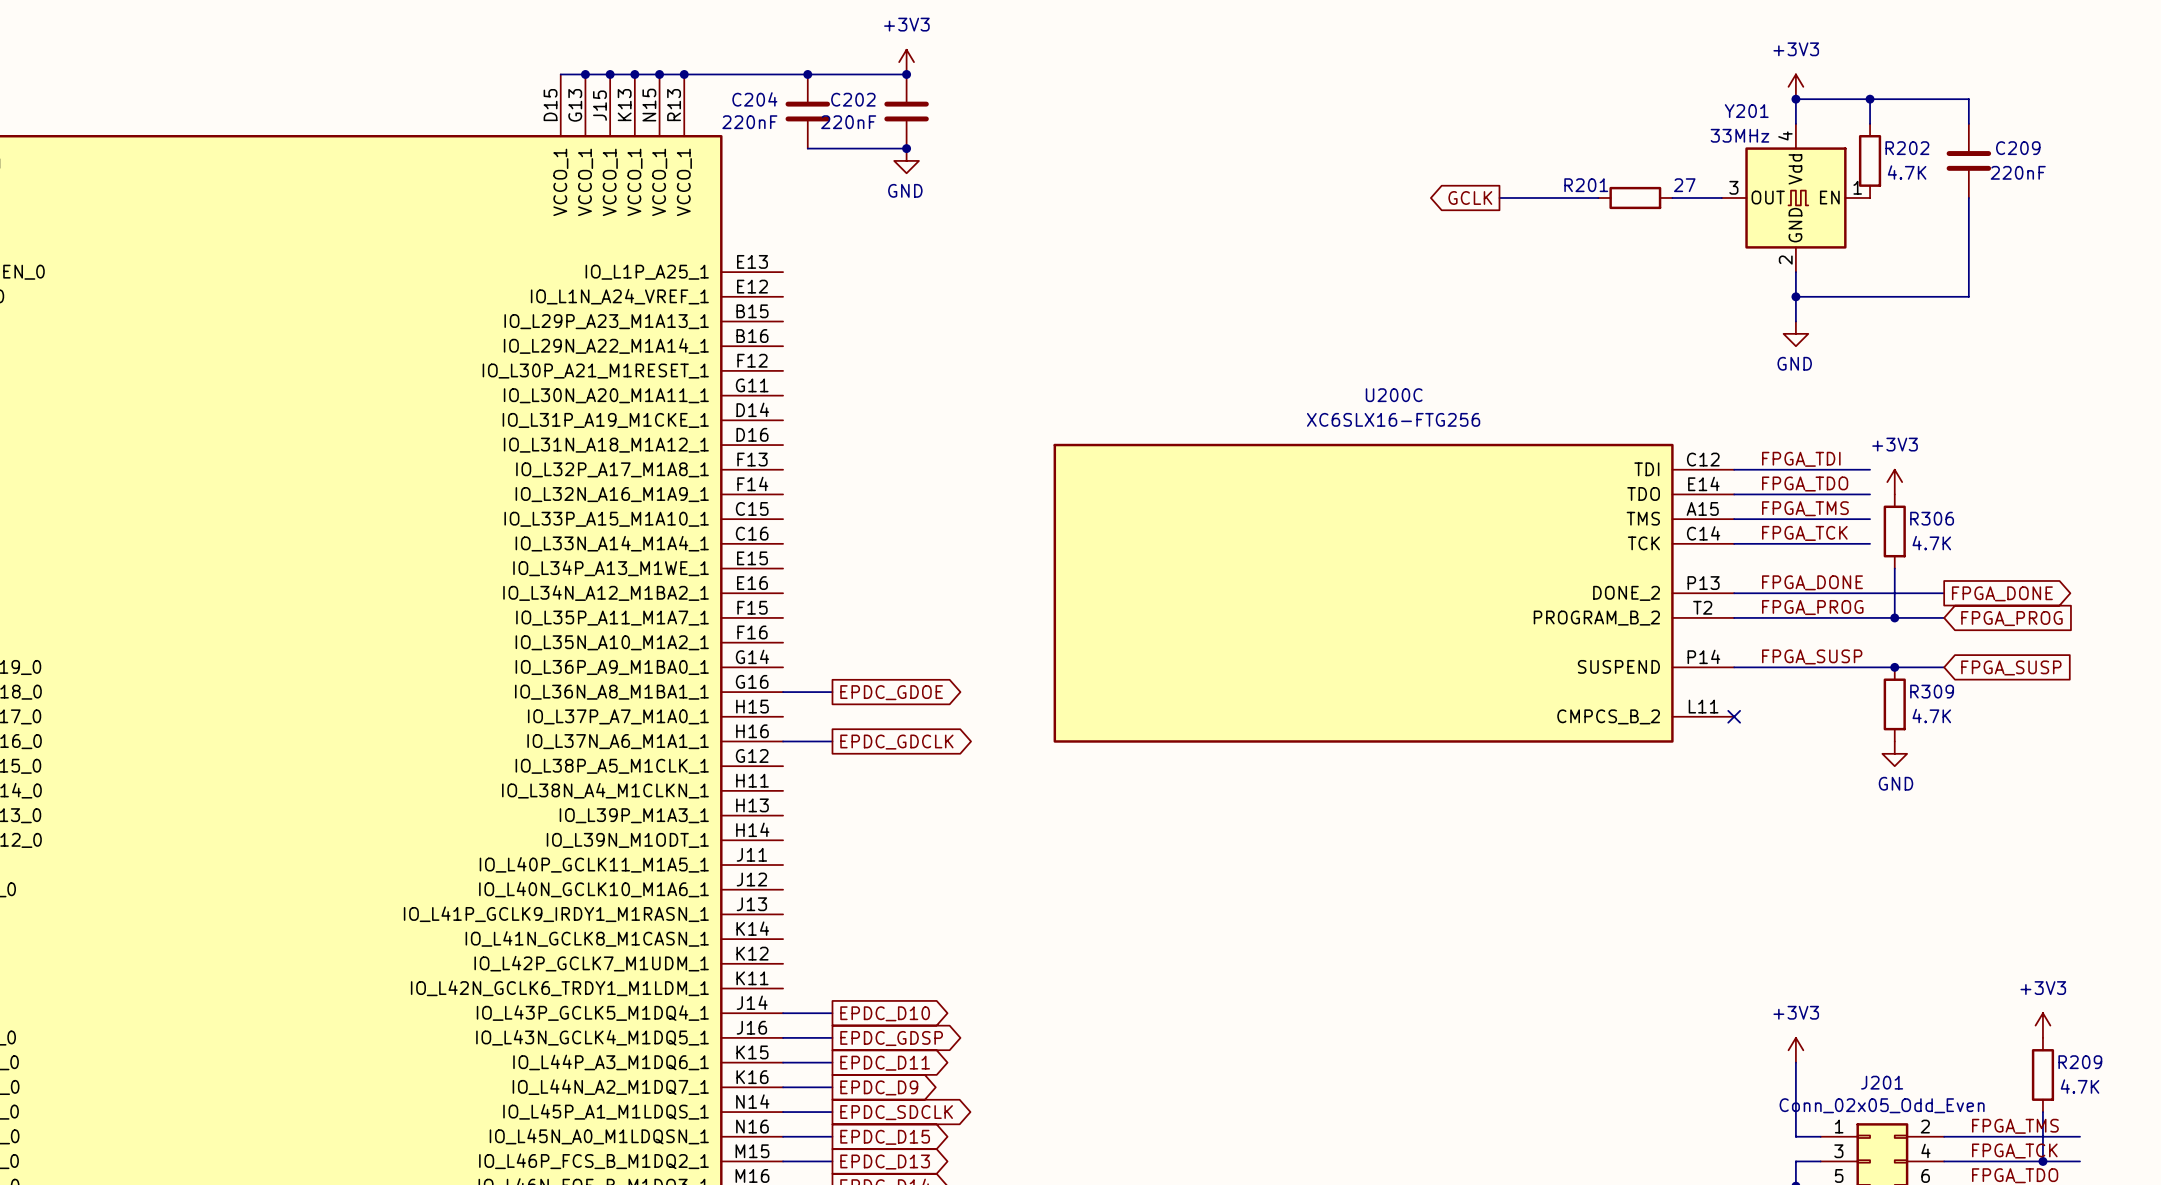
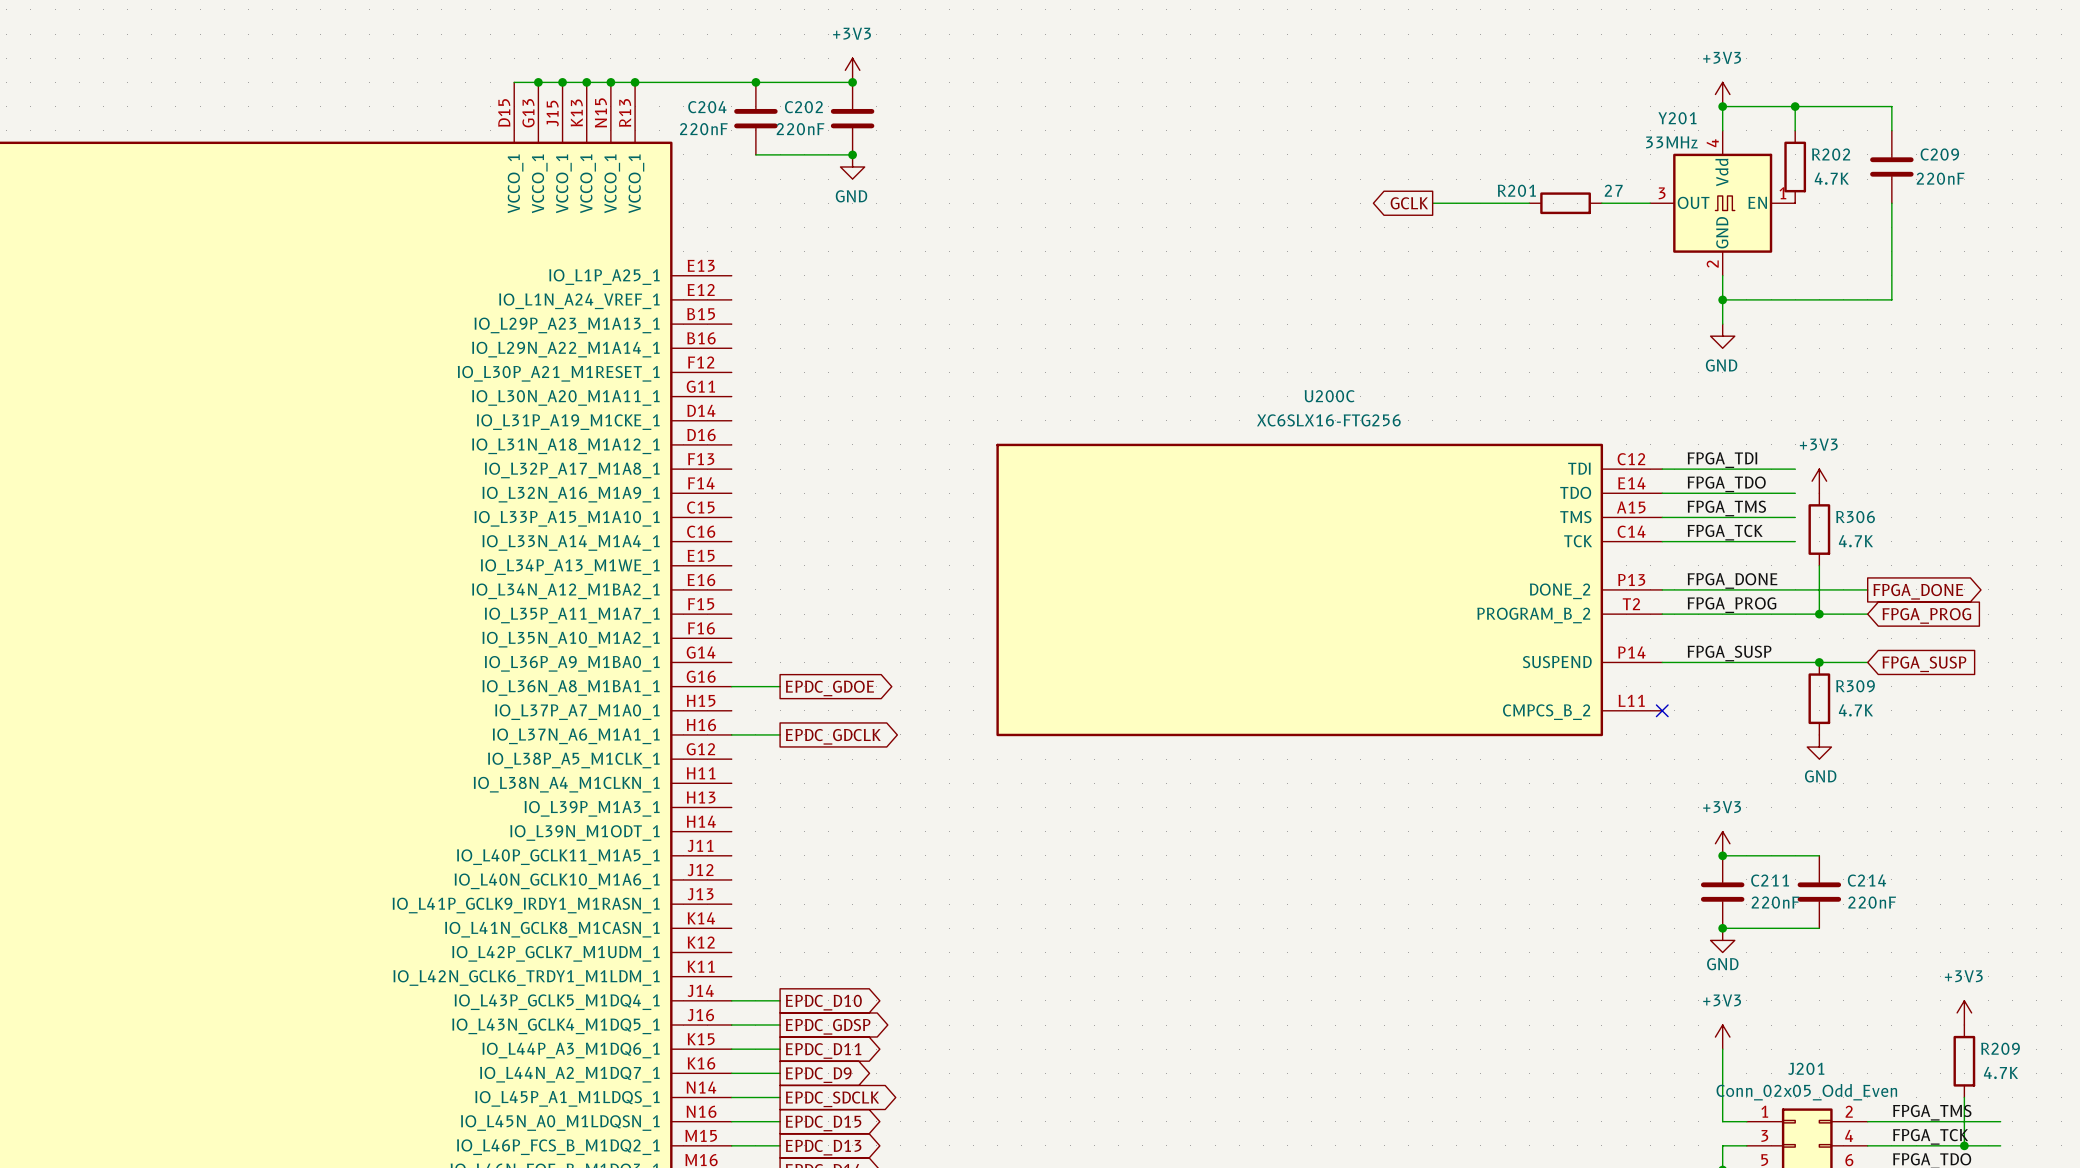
power symbol: none -> +3V3 (1722, 843)
wire: none -> (1722, 855) (1819, 855)
junction: none -> (1722, 855)
C211: none -> 220nF (1722, 892)
C214: none -> 220nF (1819, 892)
wire: none -> (1722, 928) (1819, 928)
junction: none -> (1722, 928)
power symbol: none -> GND (1722, 940)

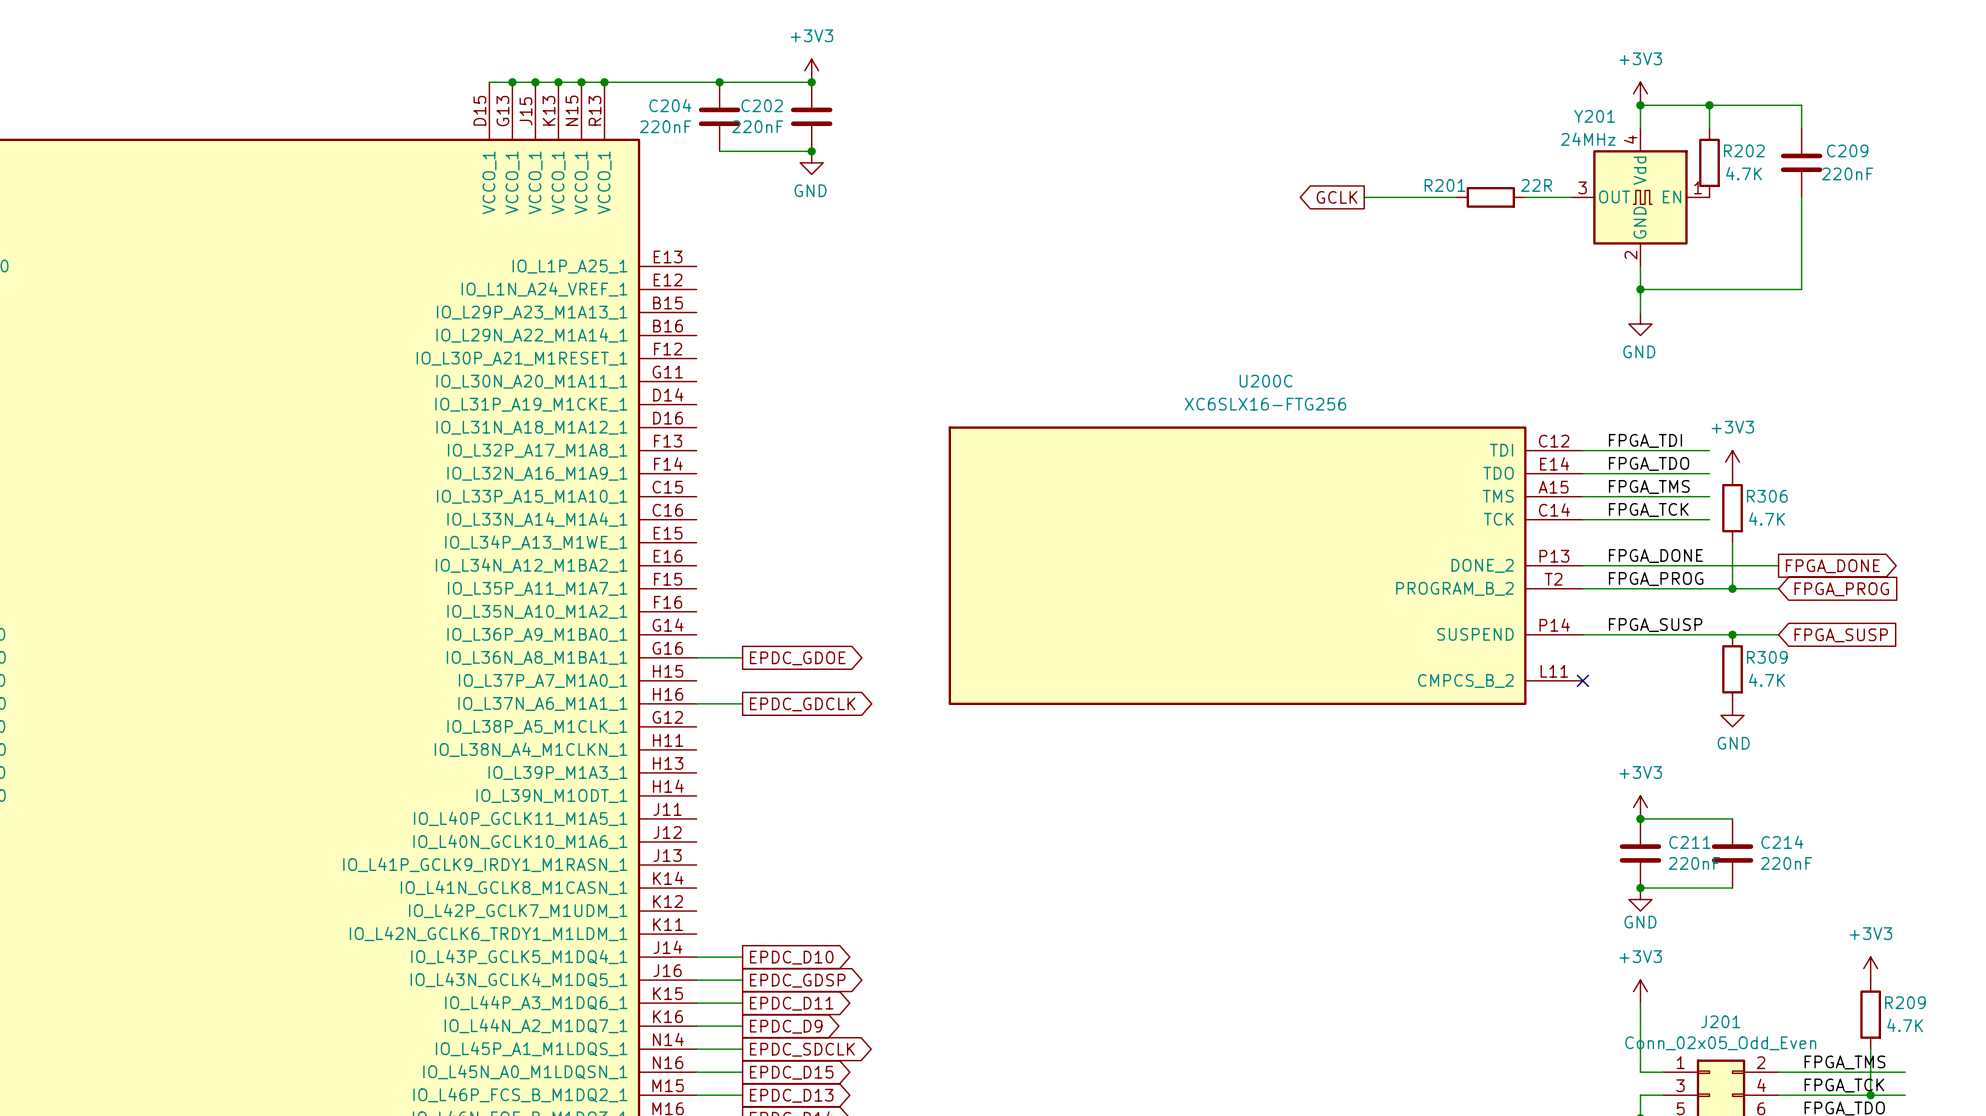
Y201 value: 33MHz (1671, 142) -> 24MHz (1588, 139)
R201 value: 27 (1613, 190) -> 22R (1536, 185)

